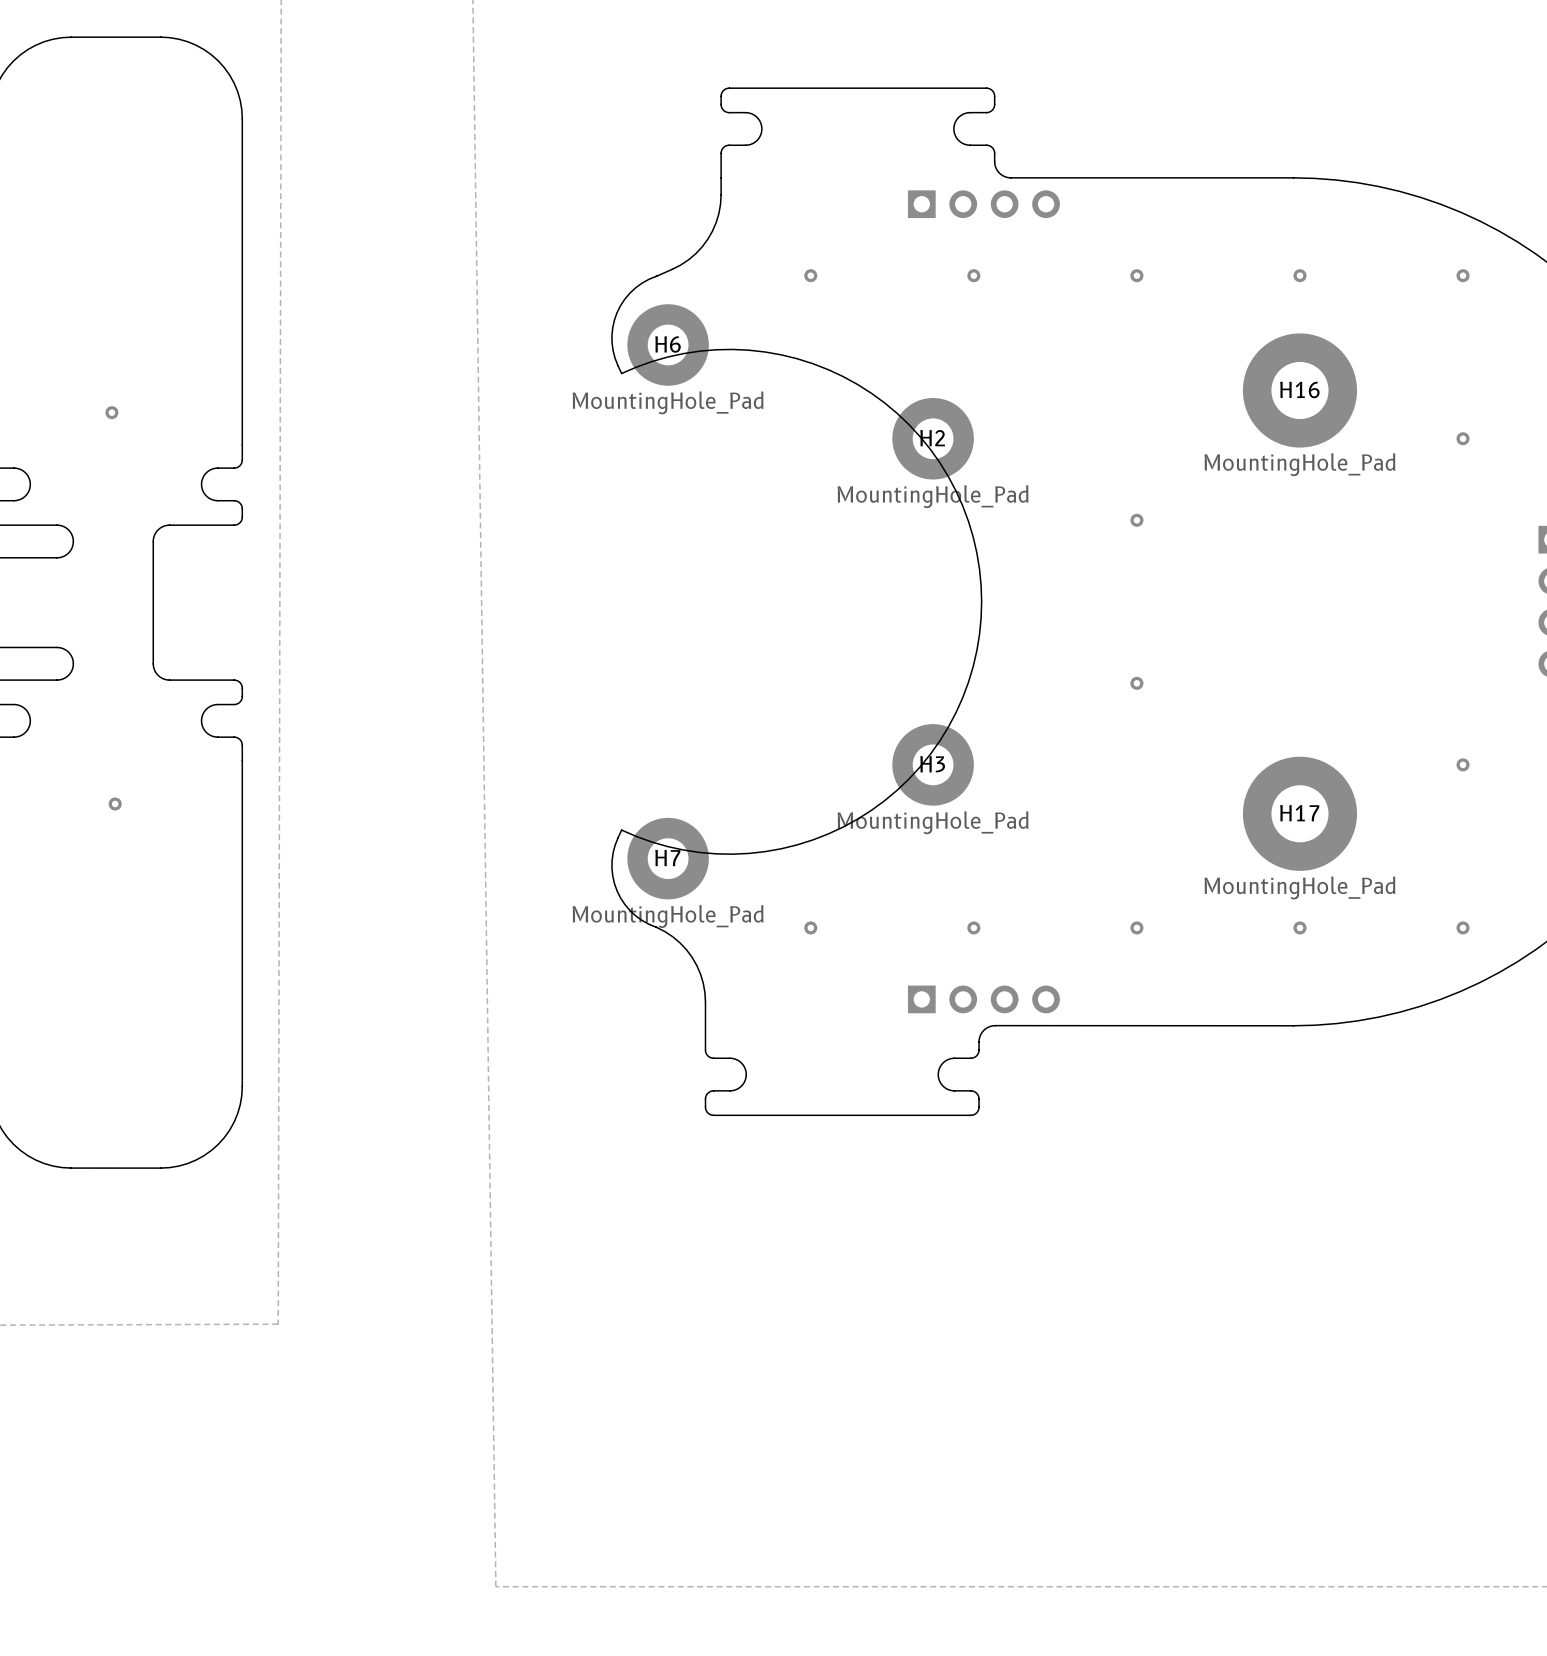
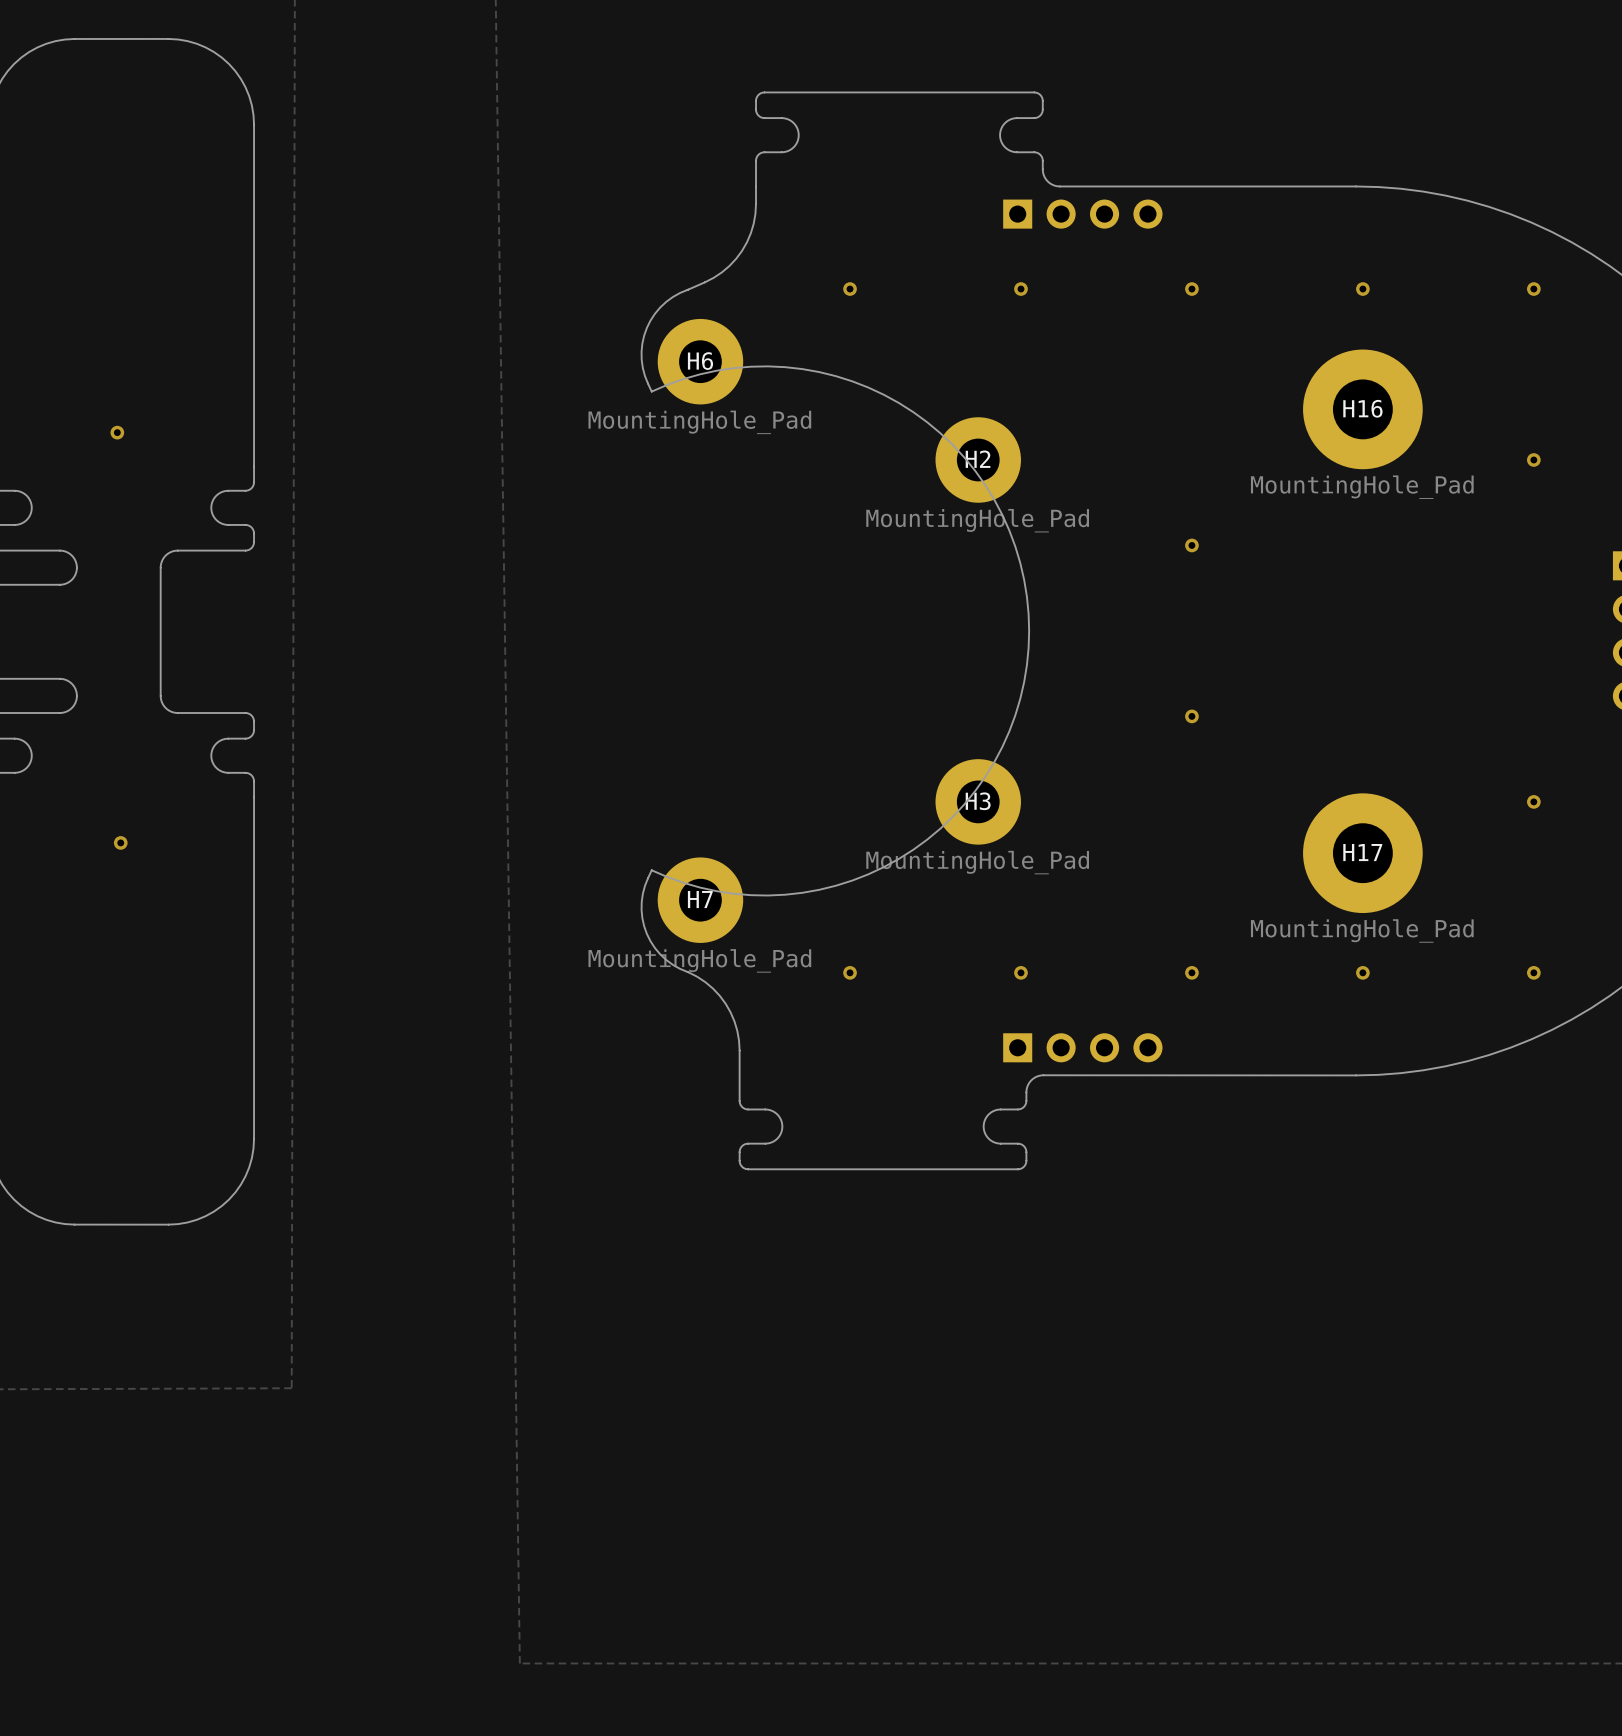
part position: (983, 204) -> (1082, 214)
part position: (983, 999) -> (1082, 1047)

